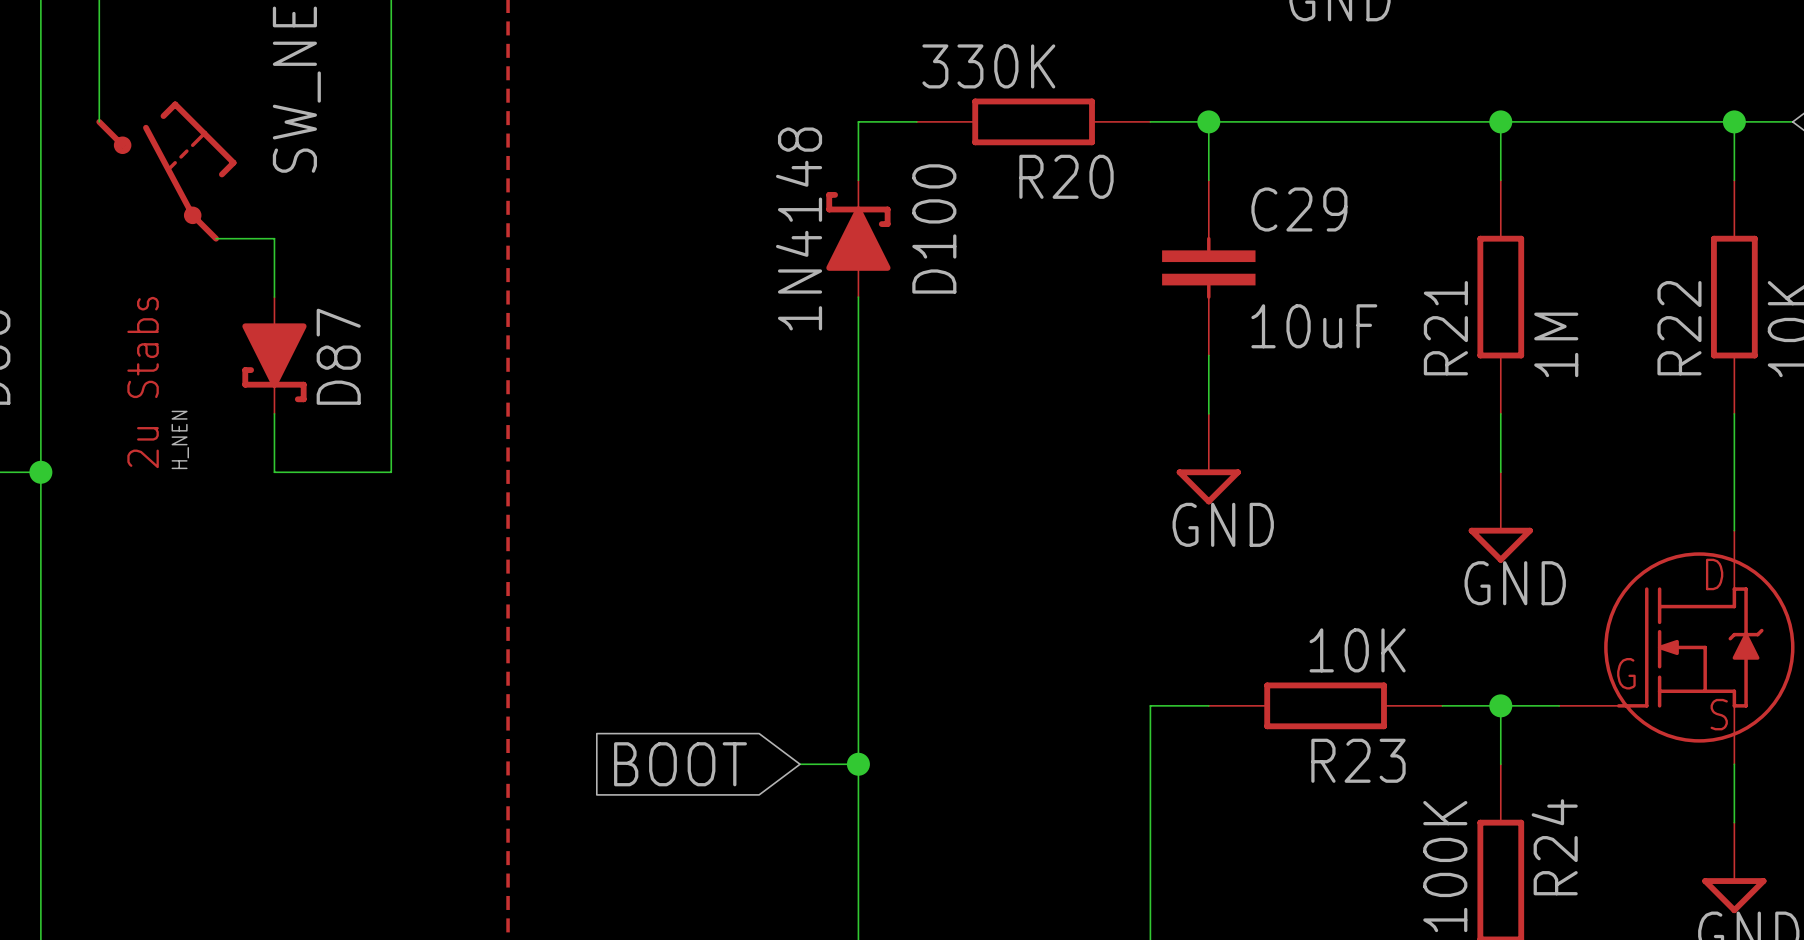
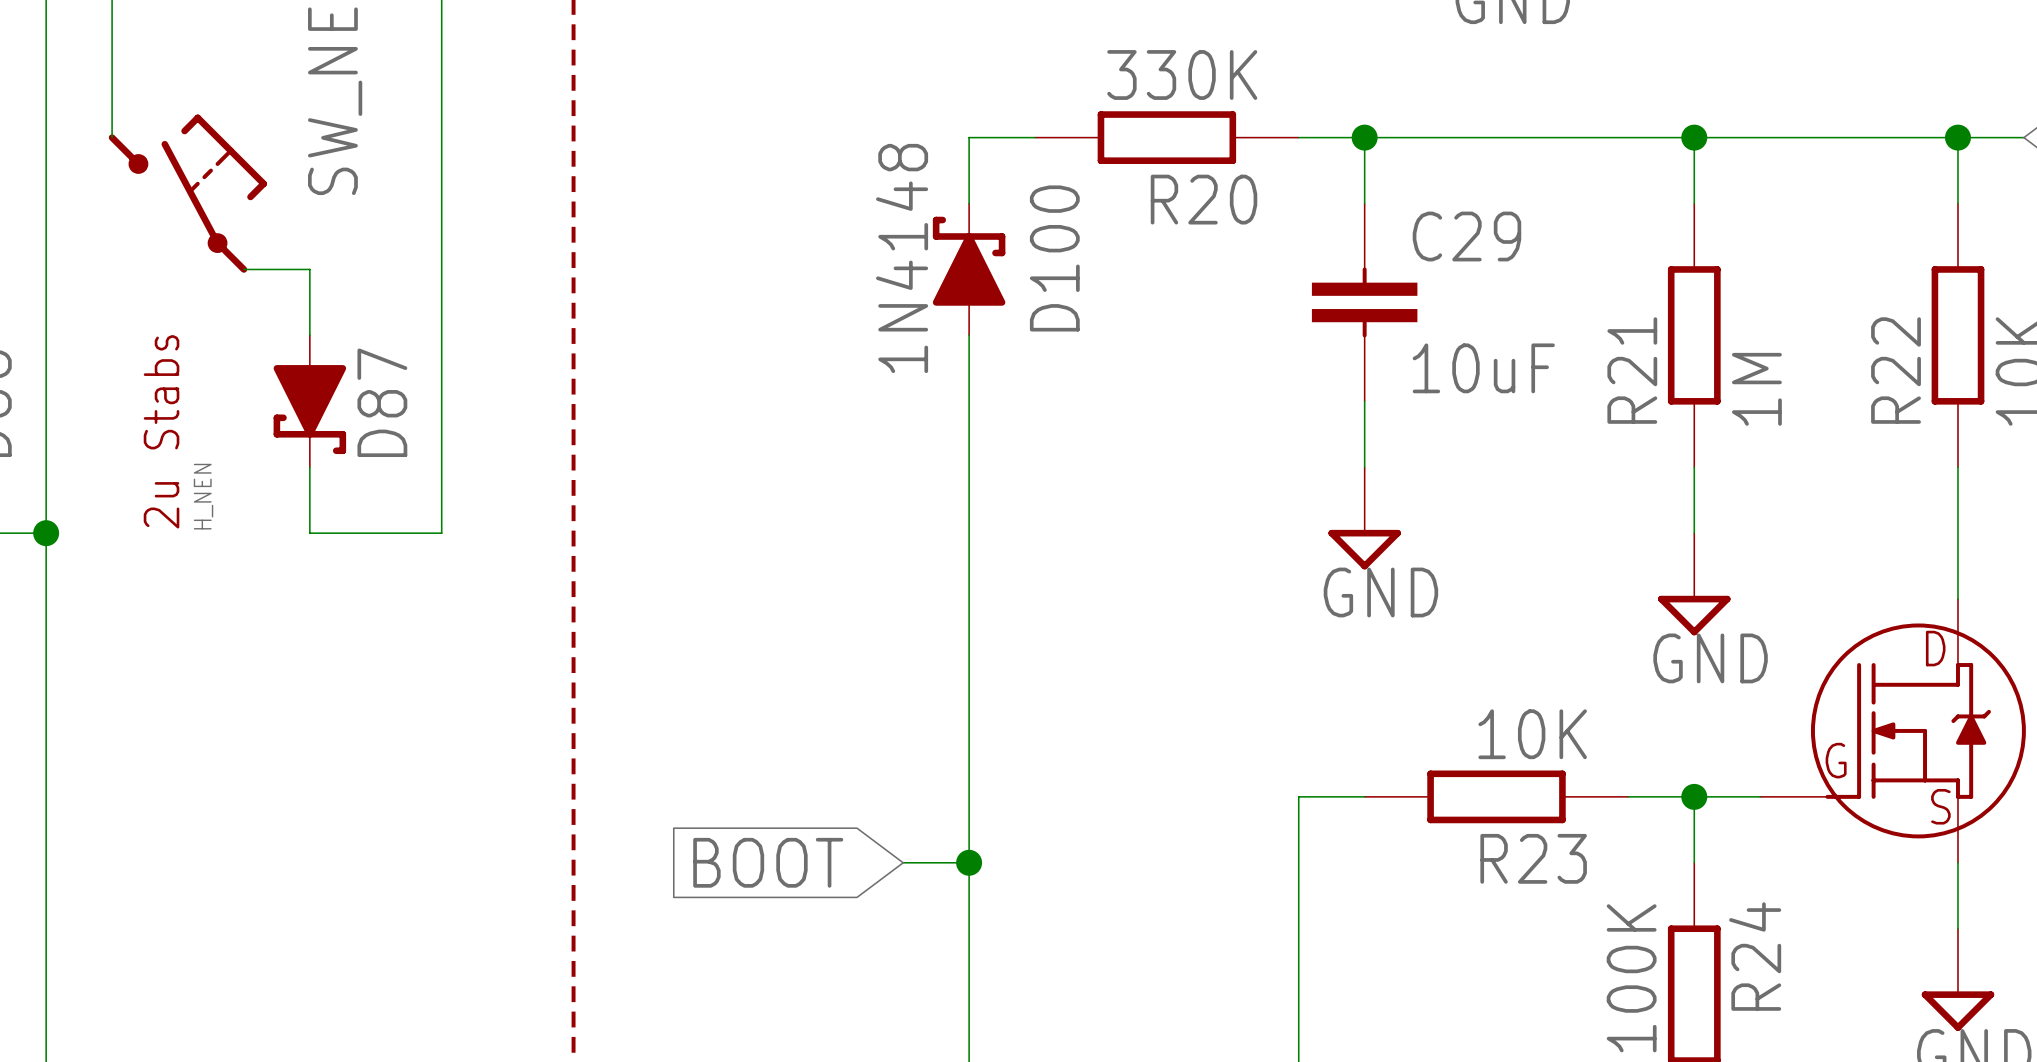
R20 value position: 330K (988, 66) -> 330K (1182, 74)

